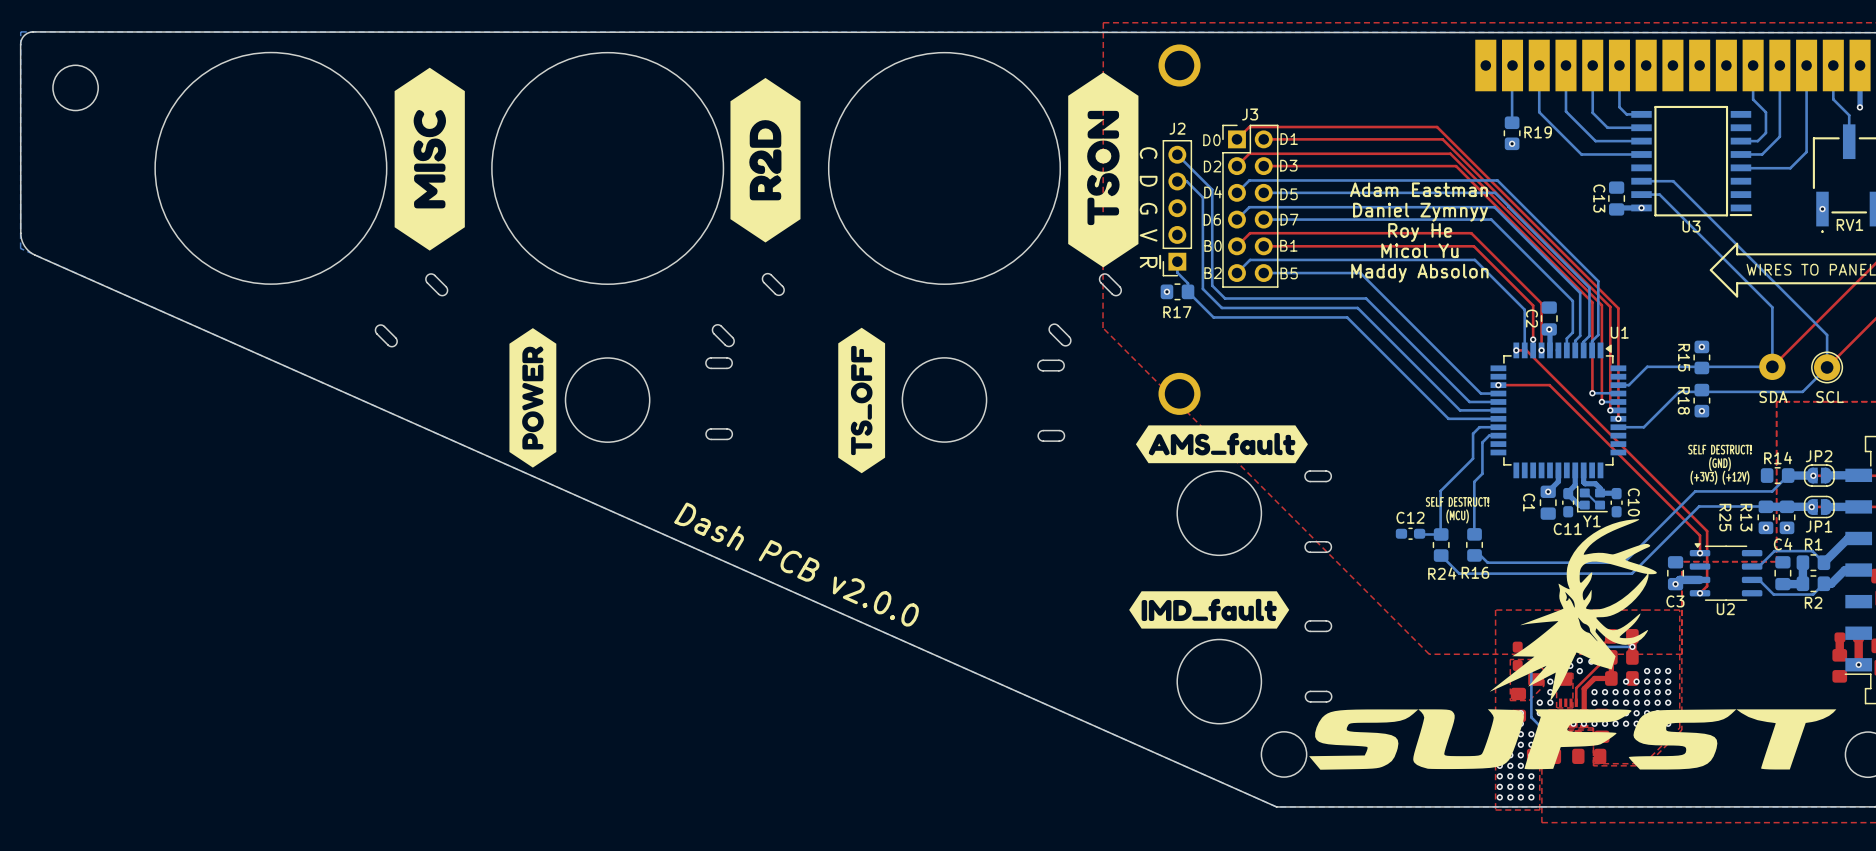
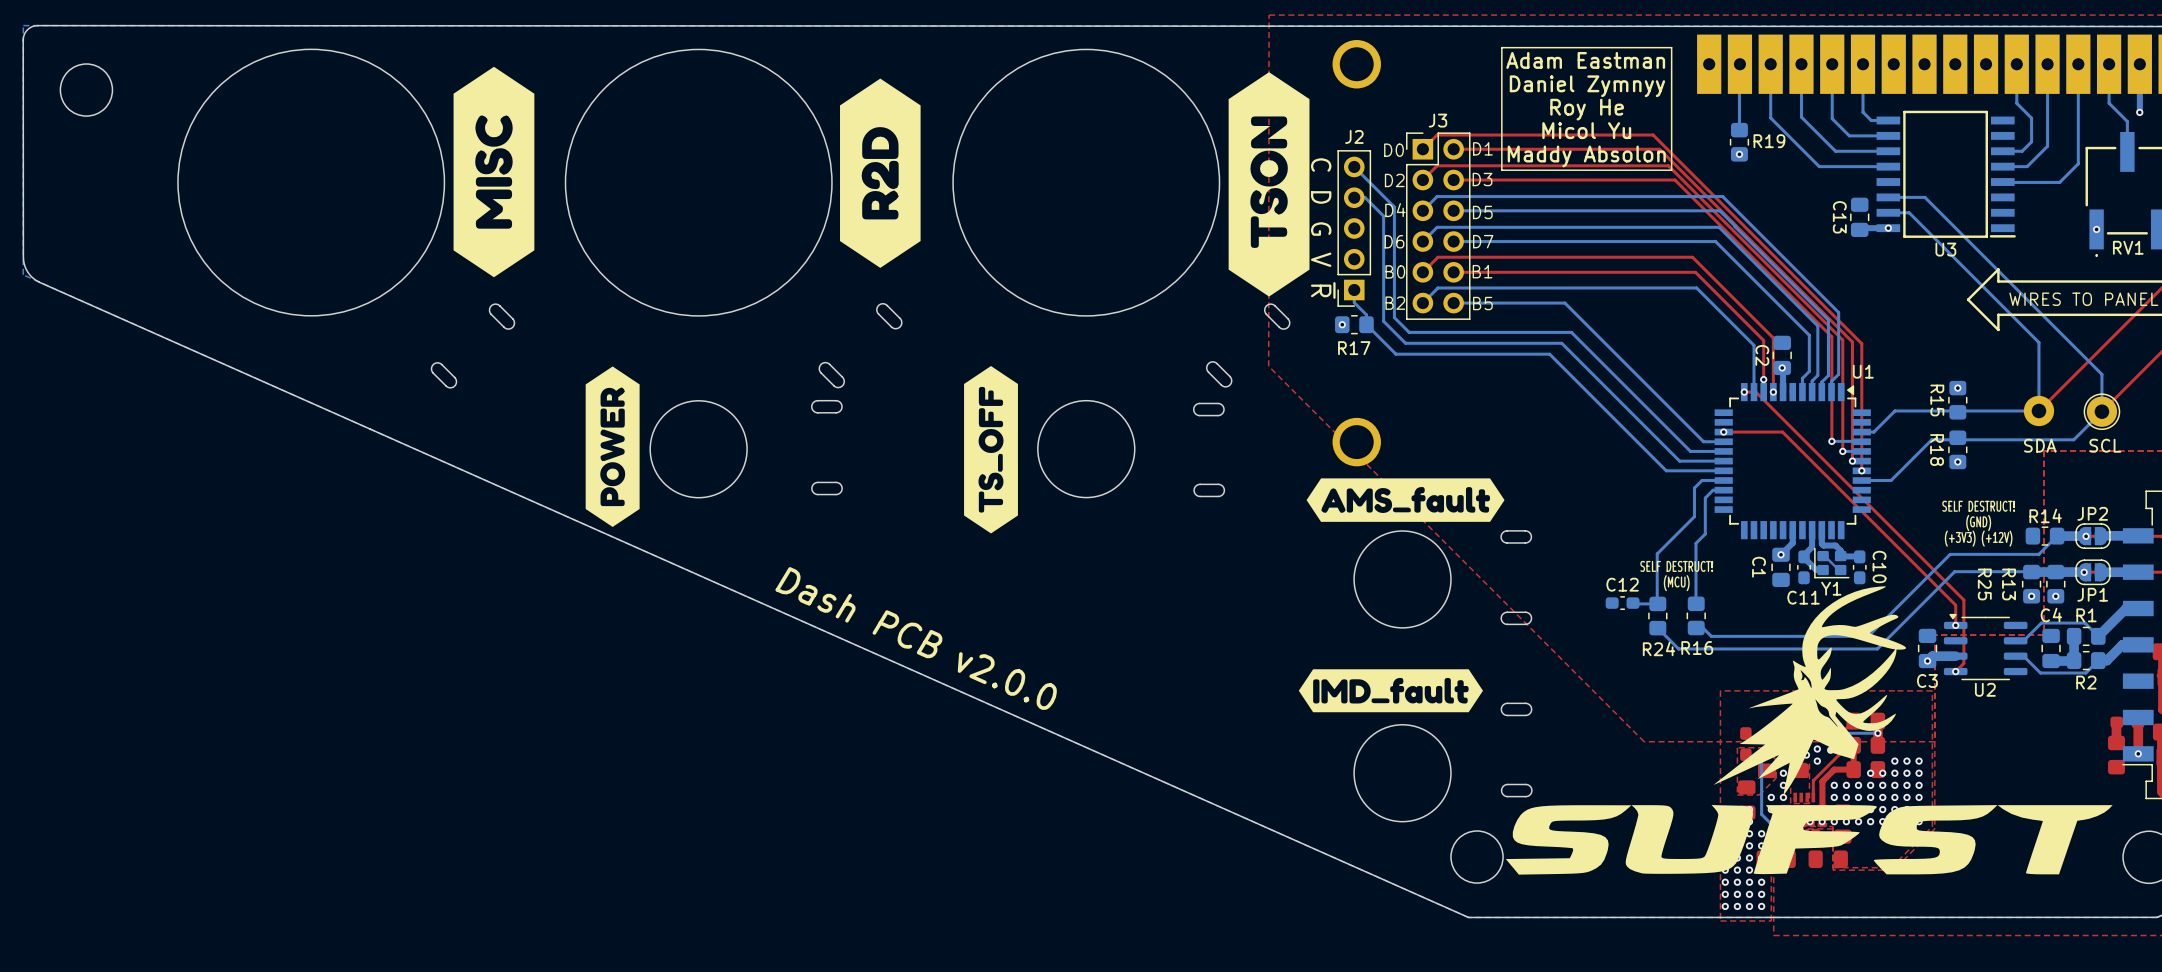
line: none -> (1671, 47) (1501, 47) (1501, 170) (1671, 170) (1671, 47)
text position: Adam Eastman (1419, 189) -> Adam Eastman (1585, 60)
text position: Daniel Zymnyy (1420, 212) -> Daniel Zymnyy (1587, 86)
text position: Roy He (1420, 232) -> Roy He (1587, 109)
text position: Micol Yu (1419, 250) -> Micol Yu (1586, 130)
text position: Maddy Absolon (1419, 273) -> Maddy Absolon (1586, 156)

